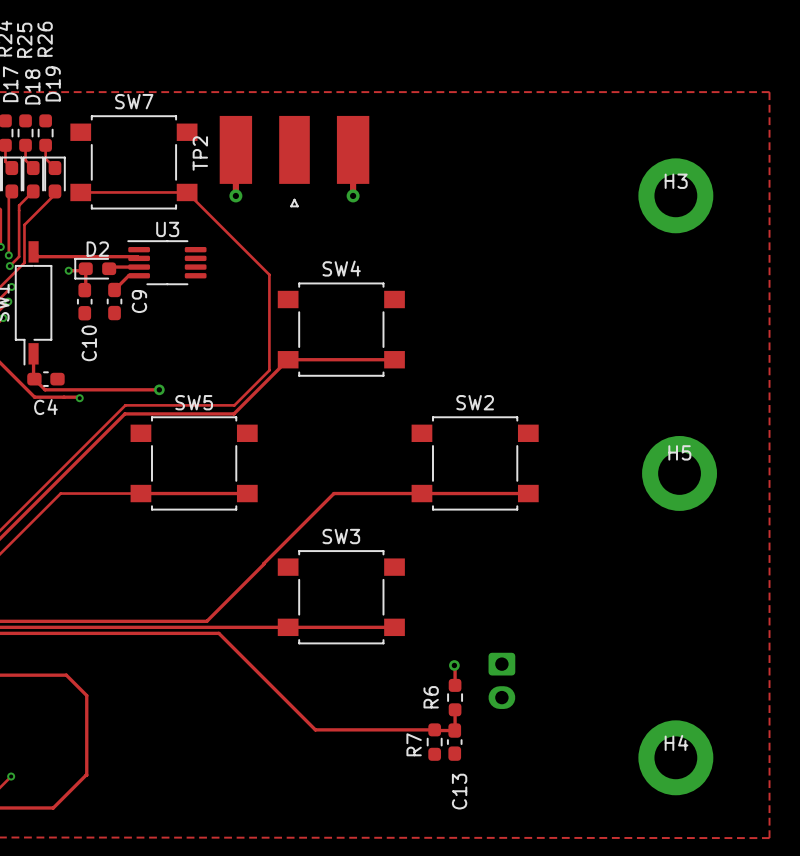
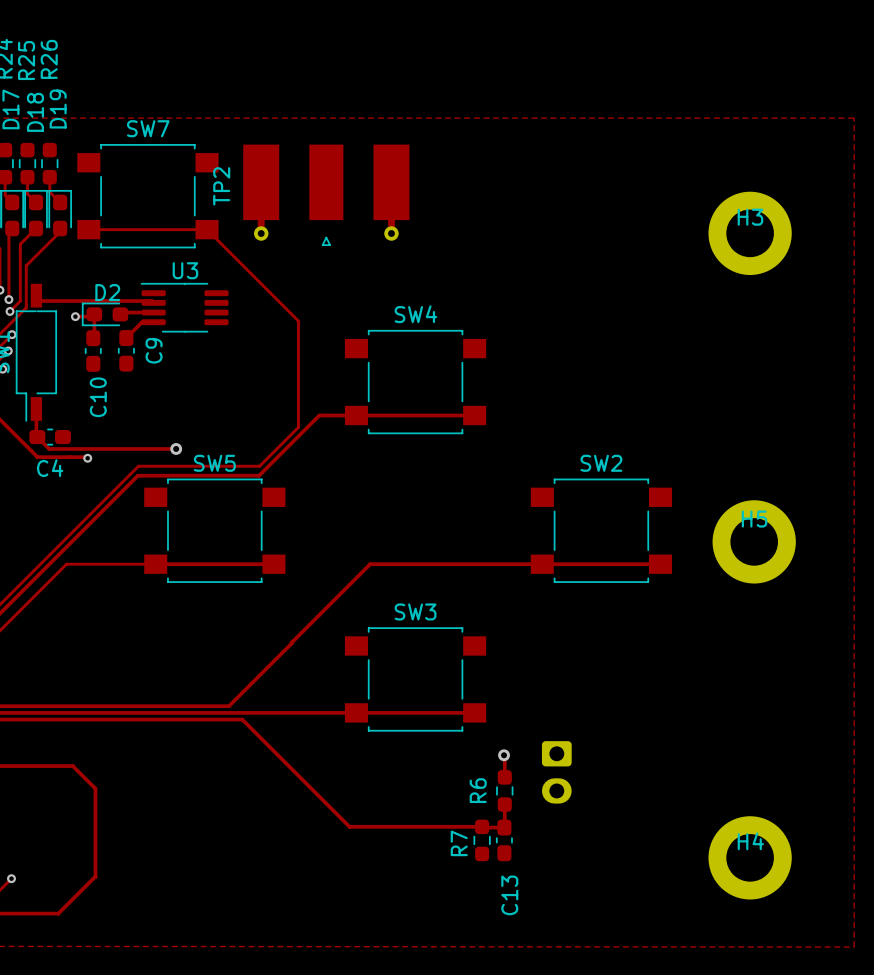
SW4 position: (341, 329) -> (415, 382)
track: none -> (437, 415) (474, 415)
SW2 position: (475, 463) -> (601, 530)
track: none -> (586, 564) (660, 564)
SW3 position: (341, 597) -> (415, 679)
track: none -> (437, 712) (474, 712)

